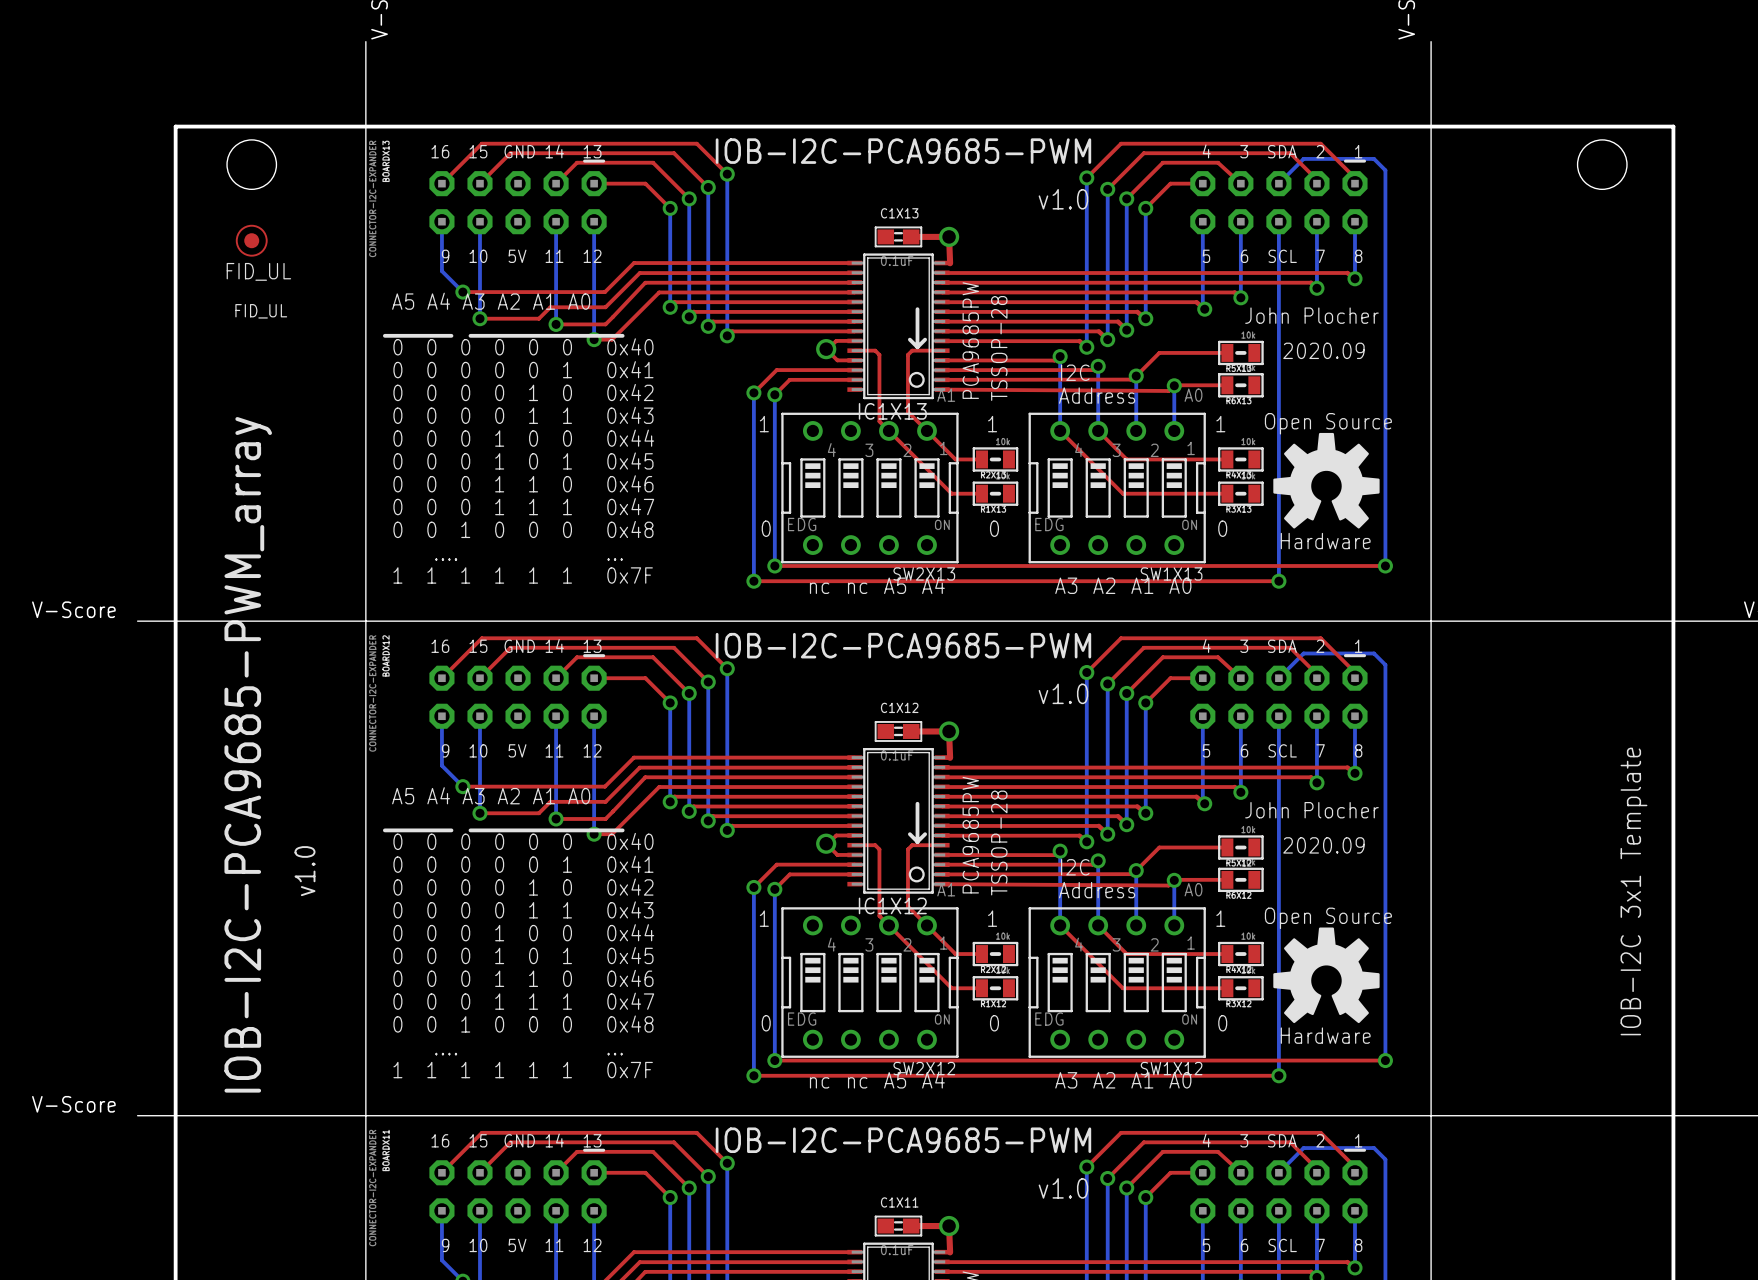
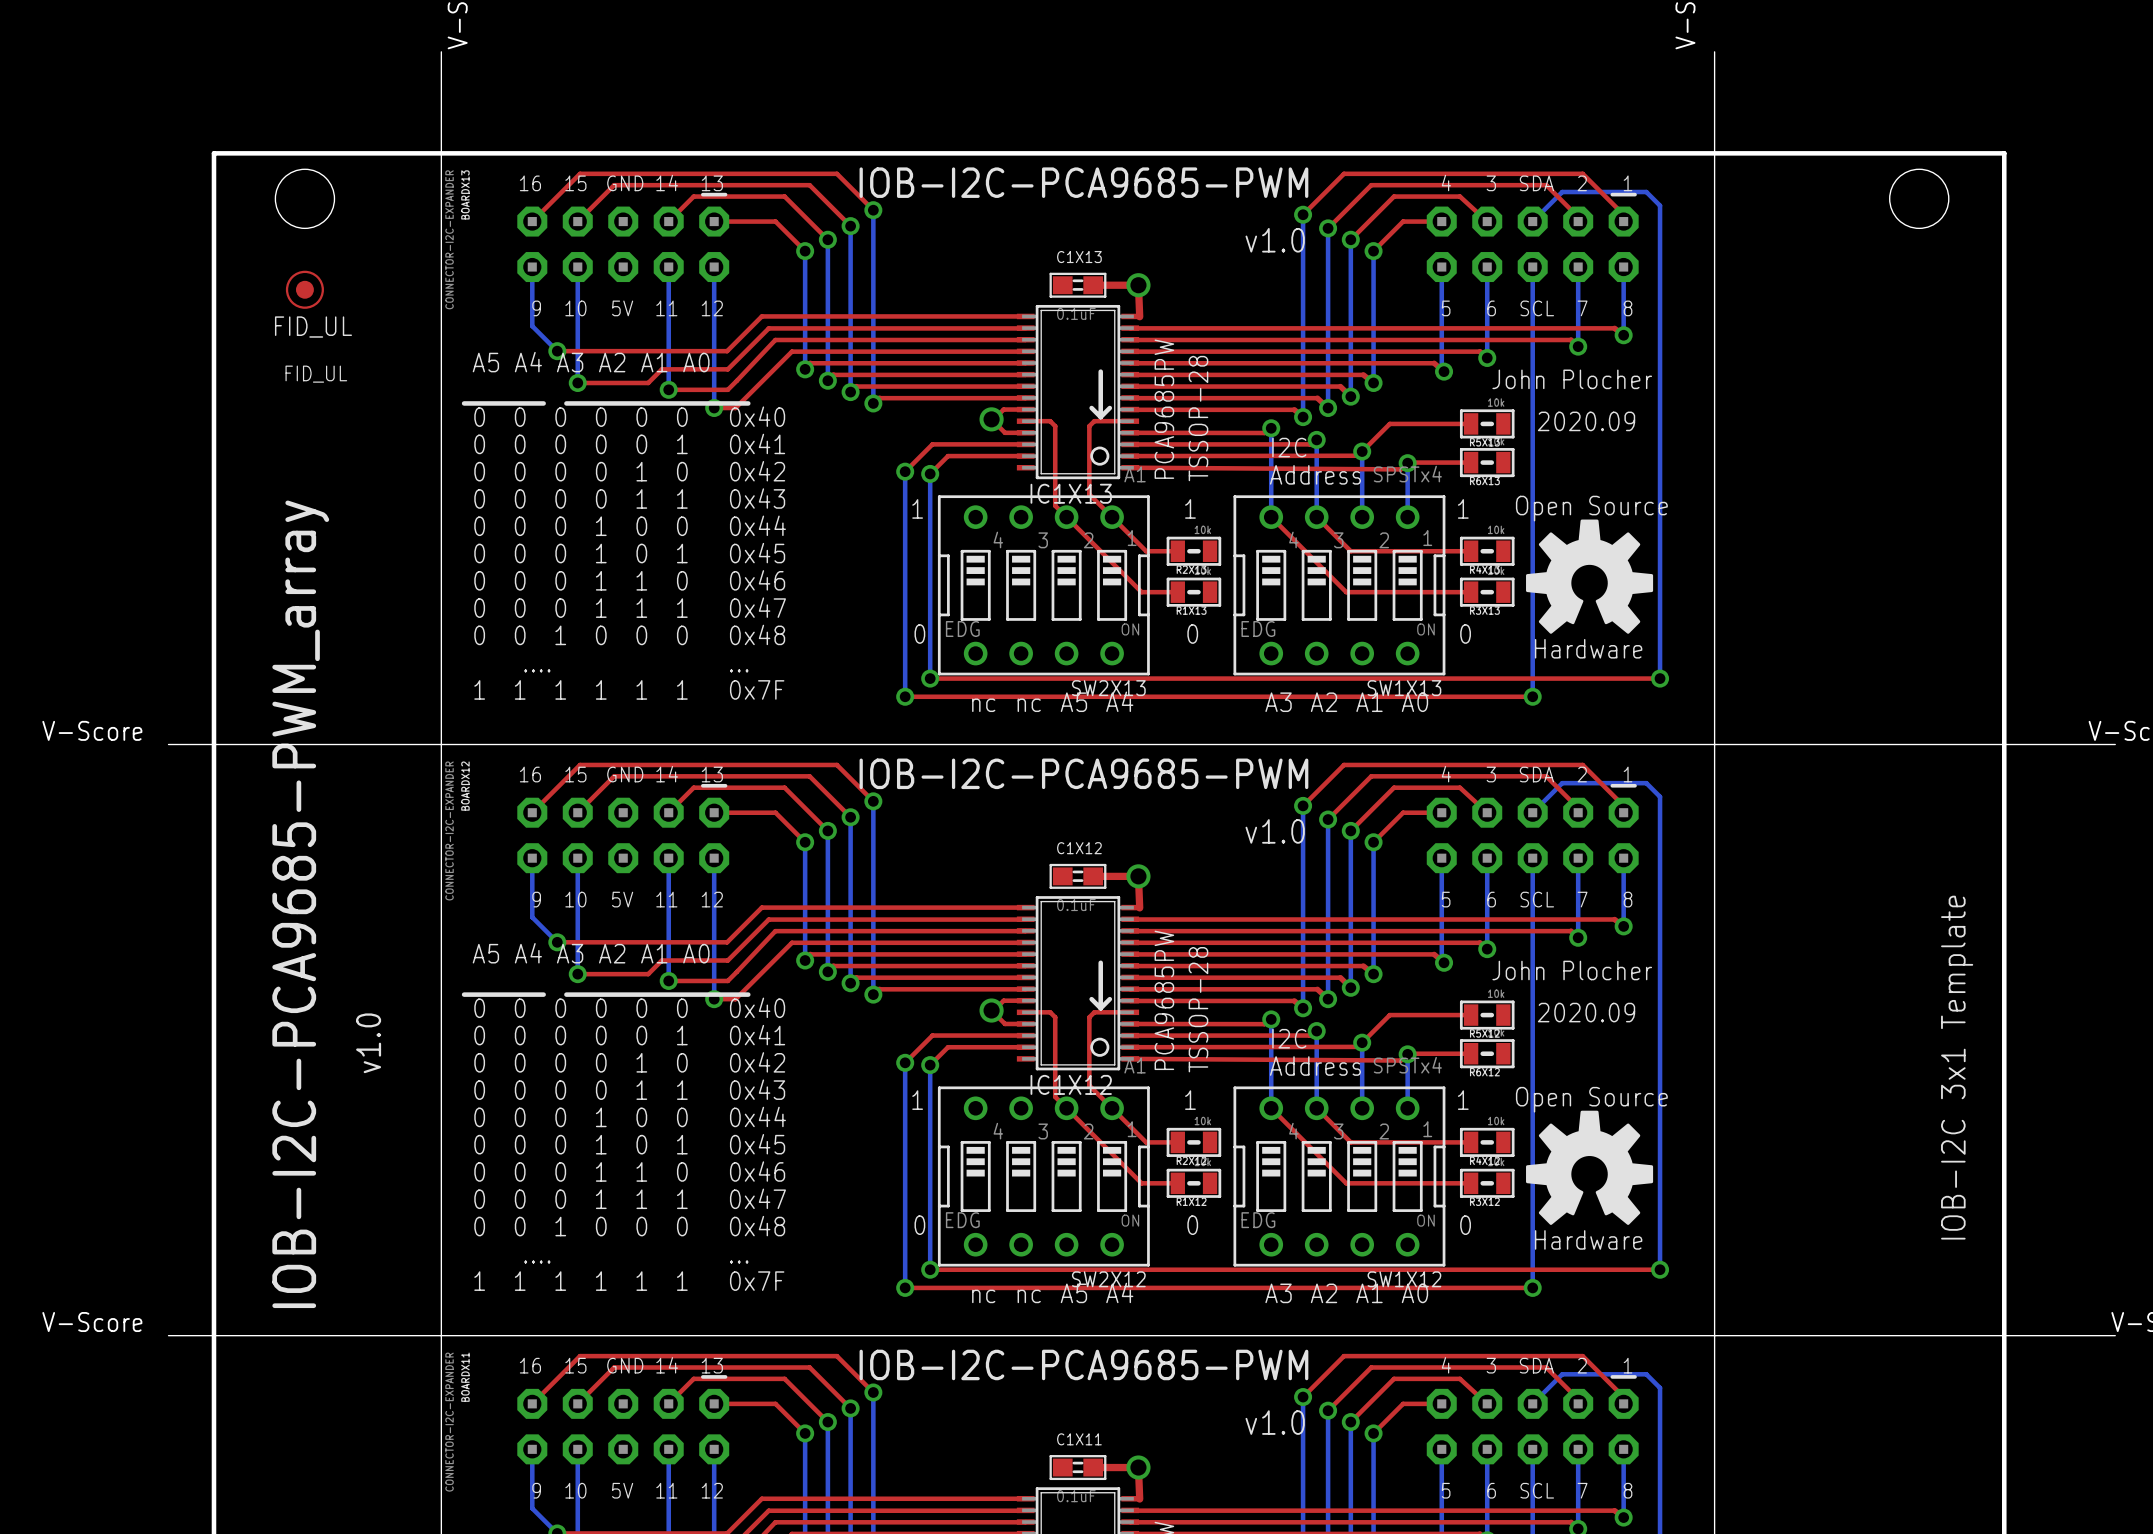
SW1X13 value: A0 (1193, 395) -> SPSTx4 (1407, 474)
SW1X12 value: A0 (1193, 889) -> SPSTx4 (1407, 1065)

